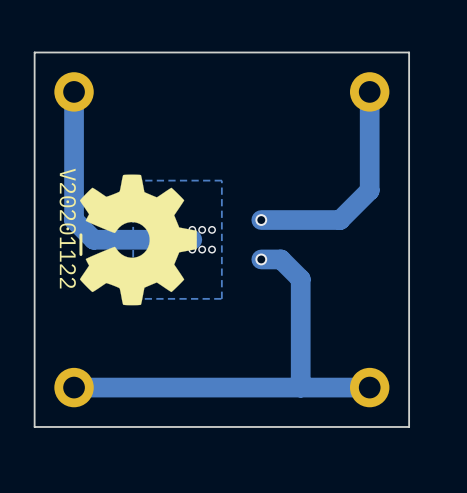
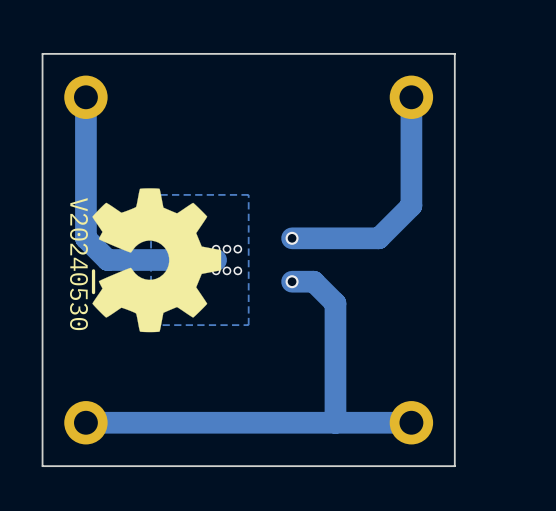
drawing shape: [59, 168, 83, 289] -> [70, 198, 96, 331]

